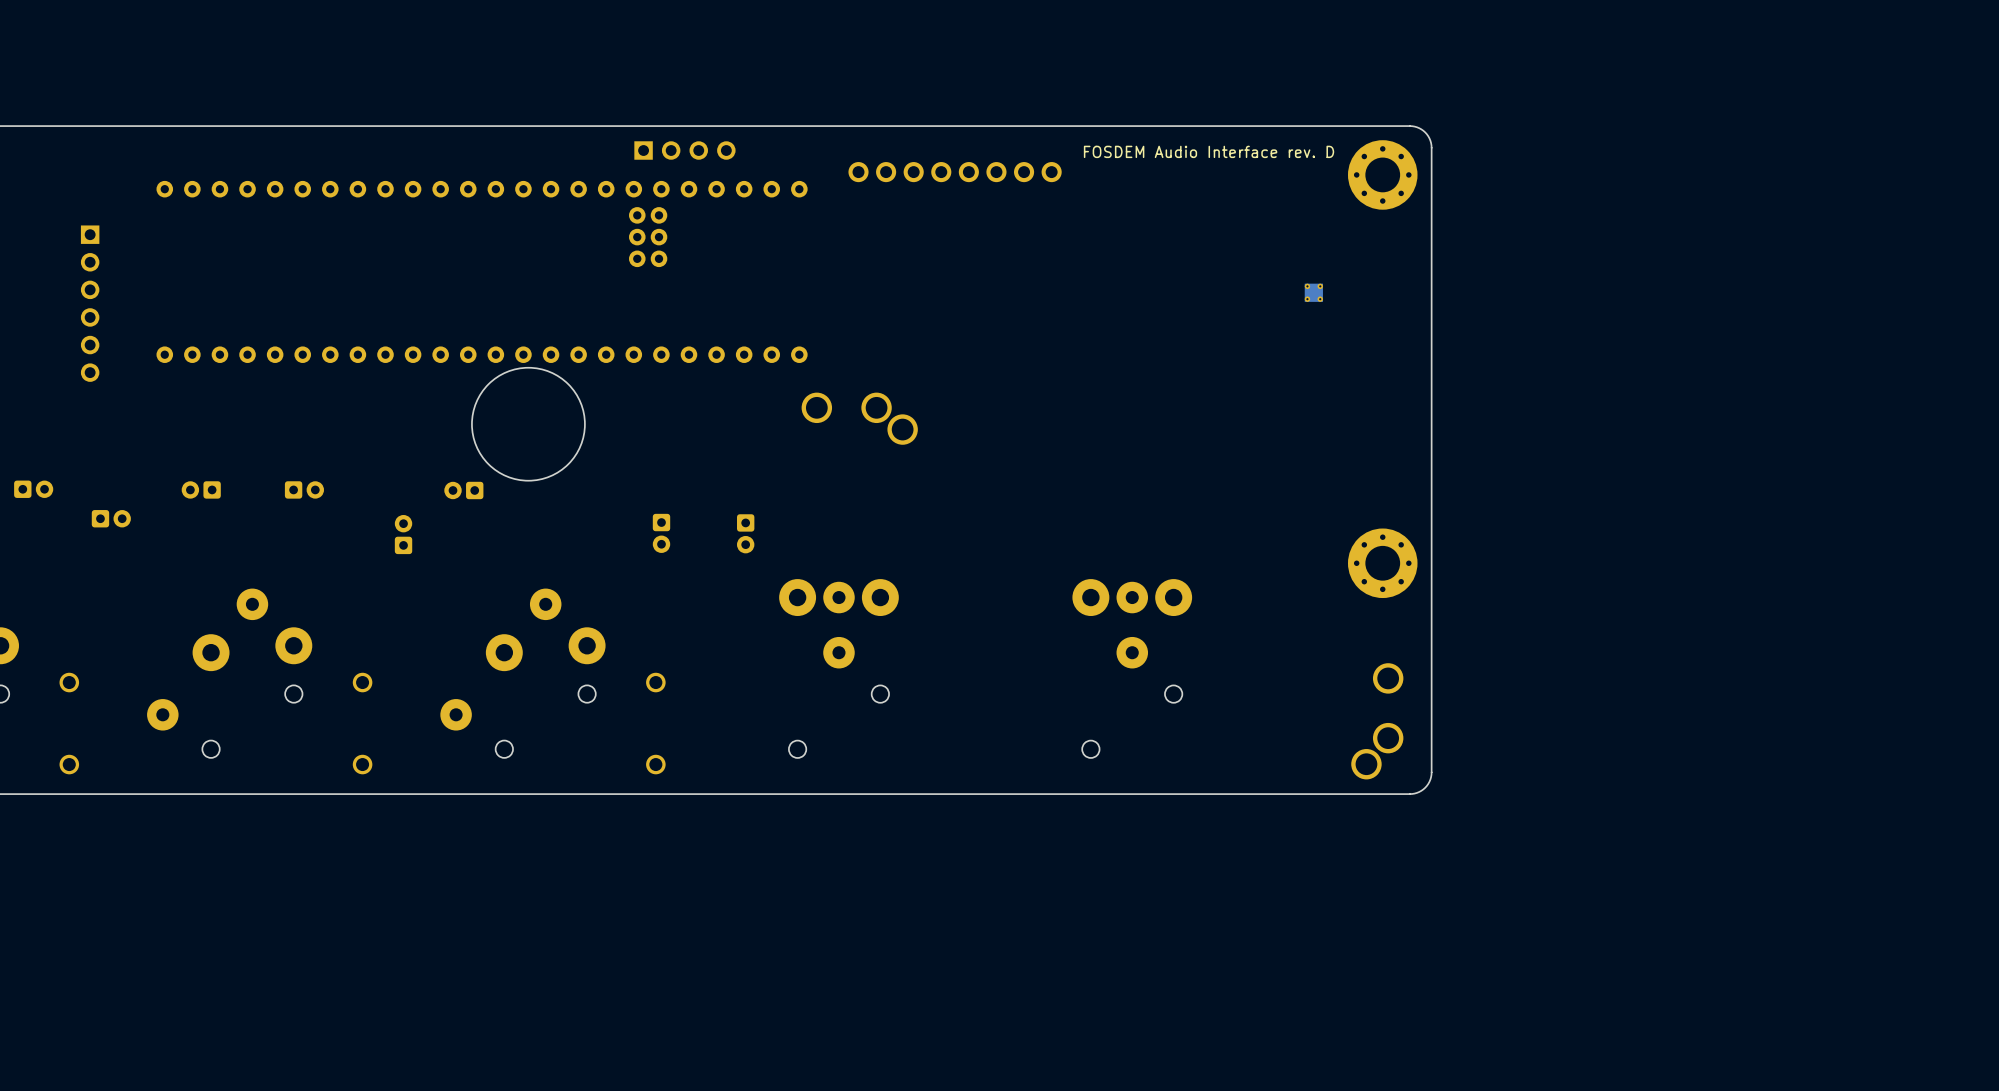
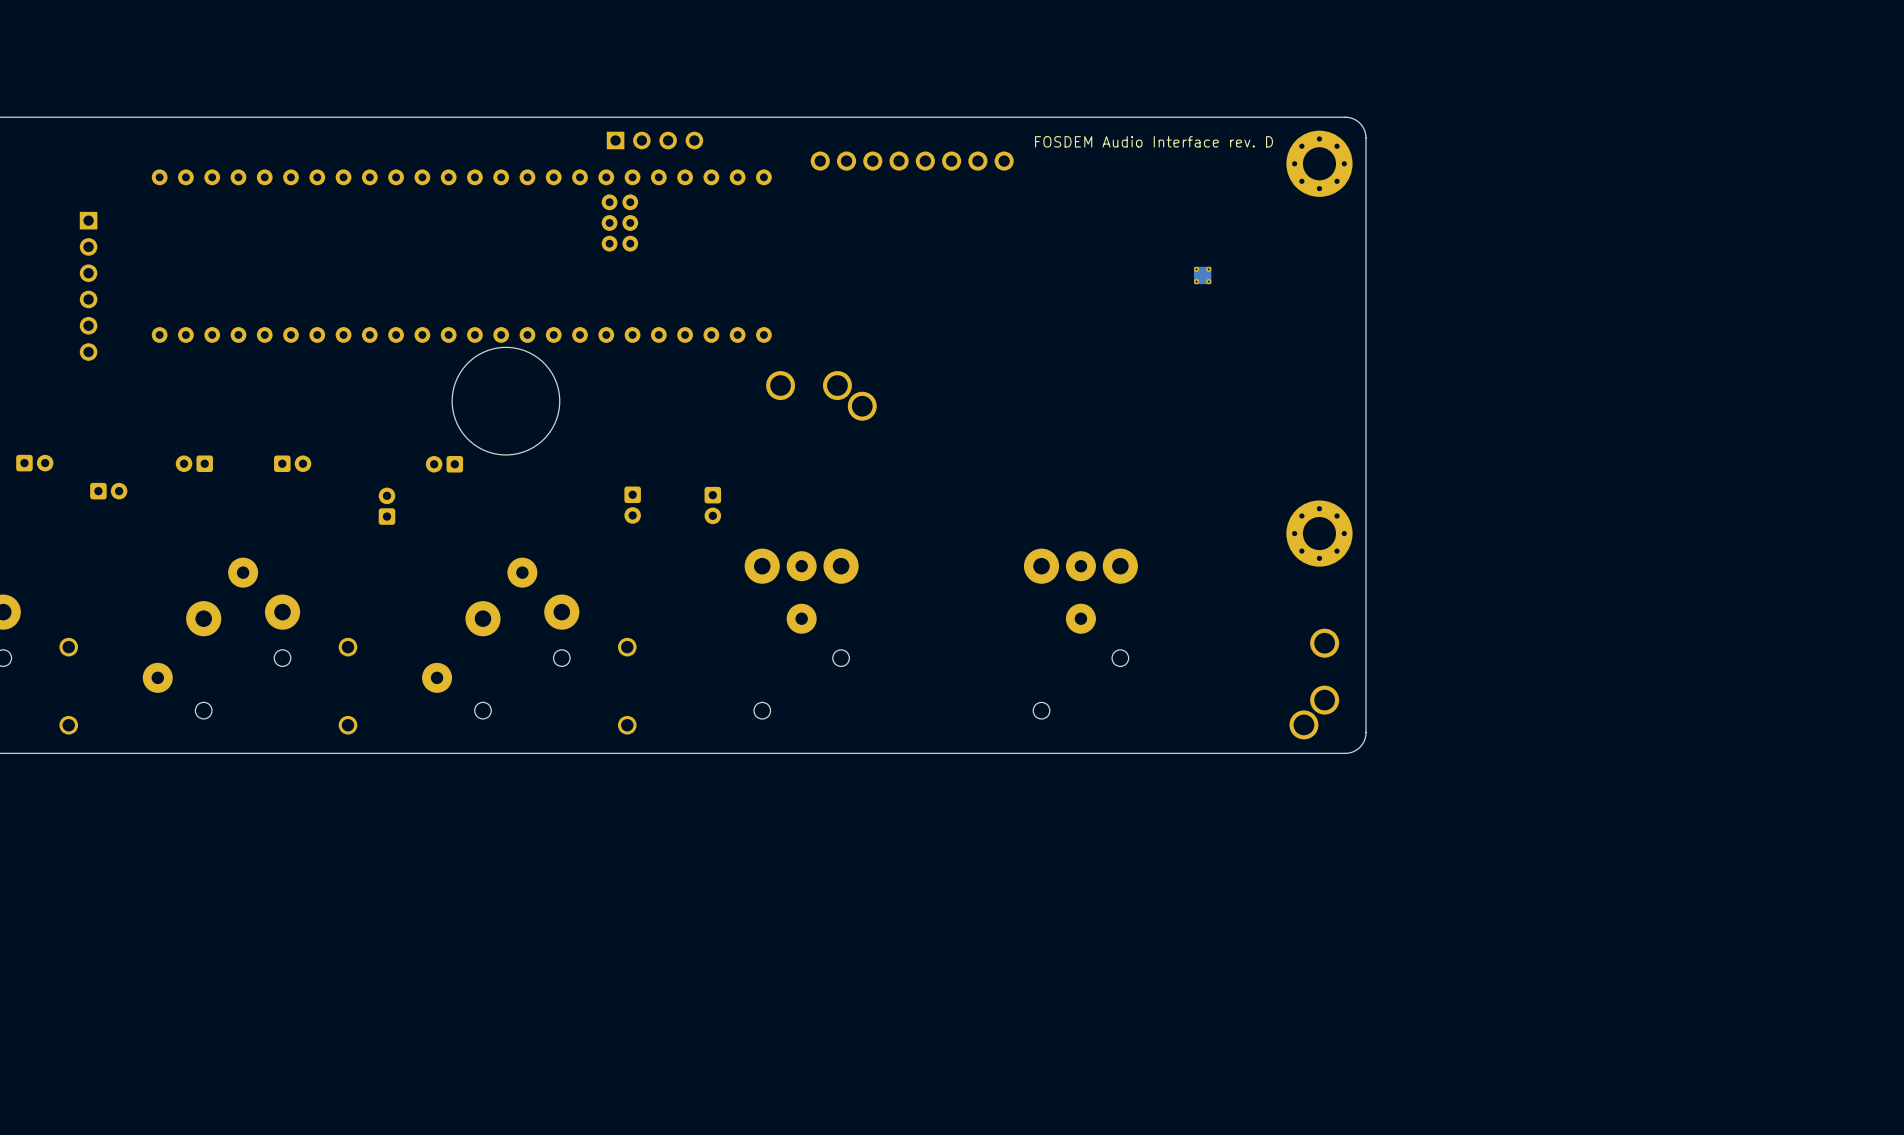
part position: (1313, 292) -> (1202, 275)

